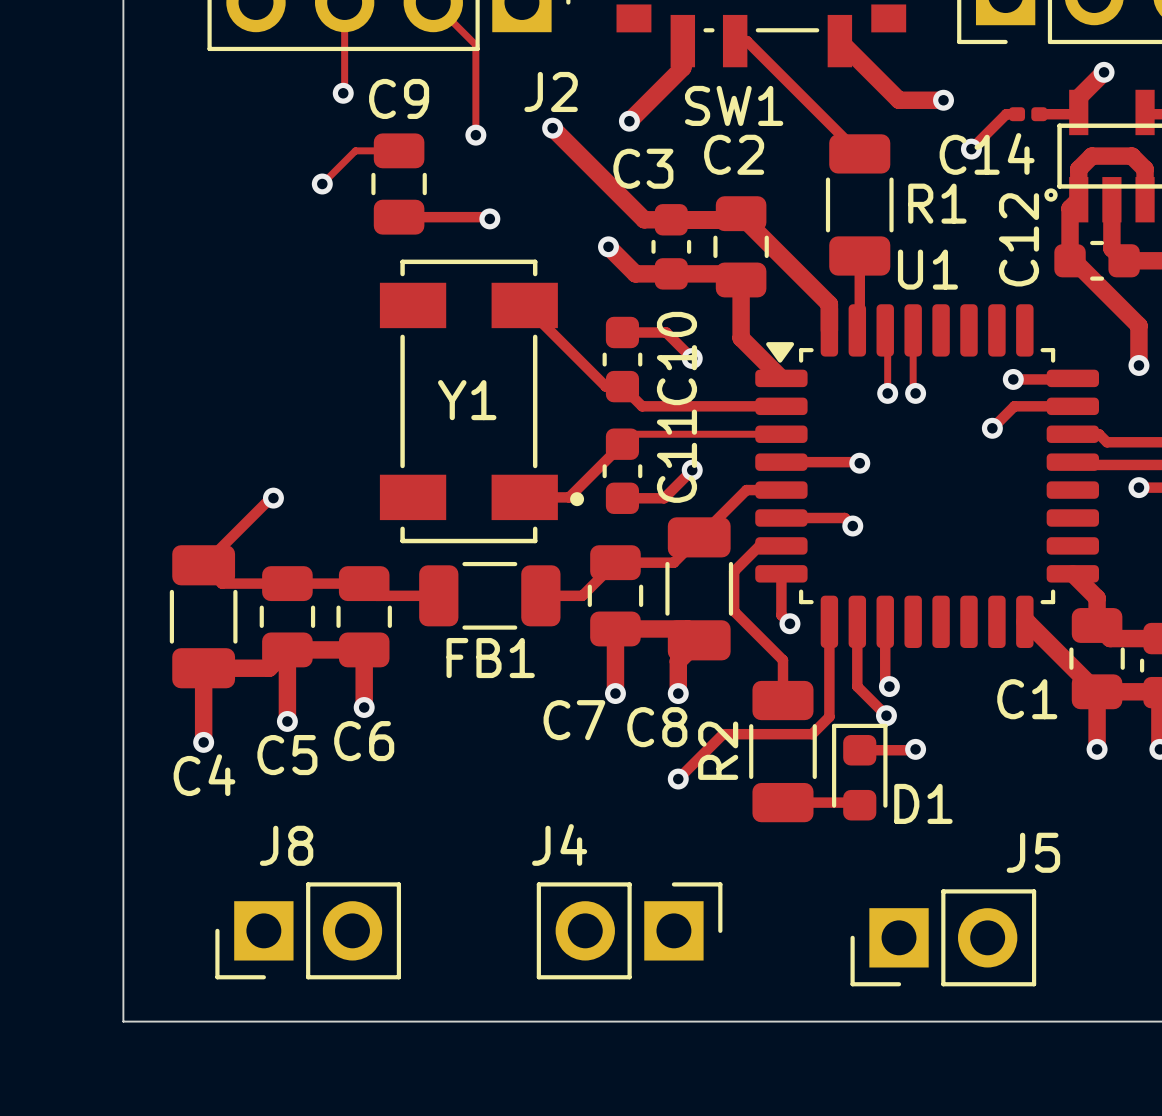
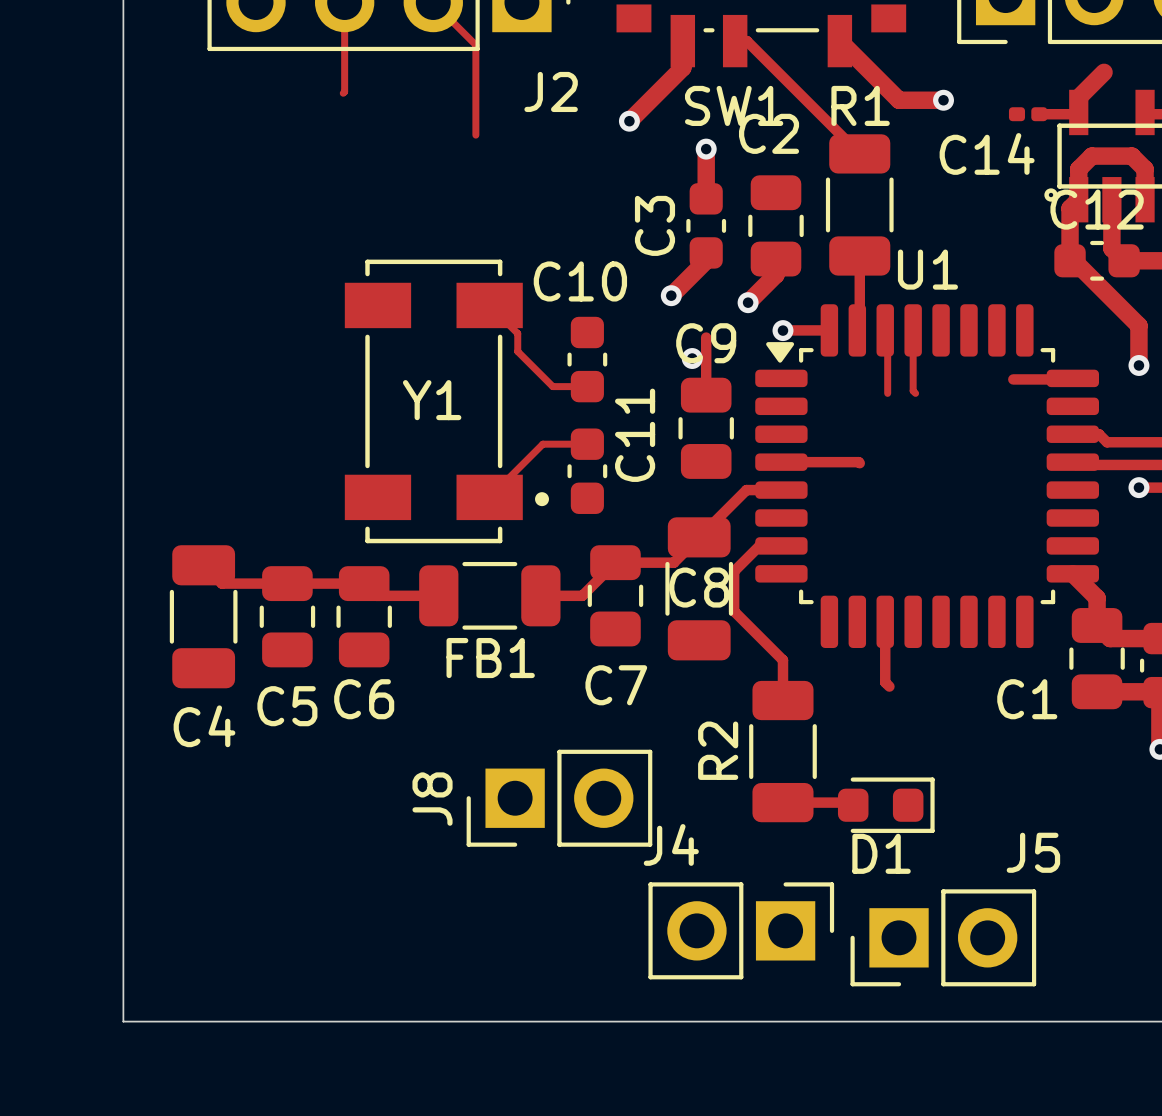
via: (1104, 72) -> none
via: (343, 93) -> none
track: (1016, 114) (1006, 114) (971, 149) -> none
track: (552, 128) (644, 219) (744, 219) (829, 304) (829, 330) -> (783, 330) (829, 330)
via: (552, 128) -> none
via: (475, 135) -> none
track: none -> (706, 149) (706, 198)
via: none -> (706, 149)
via: (971, 149) -> none
track: (399, 150) (355, 150) (322, 184) -> none
C3 name rotation: 0° (643, 168) -> 90° counterclockwise (654, 225)
via: (322, 184) -> none
C9 position: (399, 184) -> (706, 428)
R1 name position: R1 (937, 203) -> R1 (860, 105)
track: (399, 217) (488, 217) (489, 218) -> none
via: (489, 218) -> none
C12 name rotation: 0° (1018, 239) -> 90° clockwise (1097, 209)
track: (608, 246) (635, 273) (734, 273) (741, 279) (741, 338) (781, 378) -> none
via: (608, 246) -> none
C3 position: (671, 246) -> (706, 225)
C2 position: (741, 246) -> (776, 225)
track: none -> (706, 252) (706, 260) (671, 295)
track: none -> (776, 259) (776, 274) (748, 302)
via: none -> (671, 295)
via: none -> (748, 302)
track: none -> (489, 305) (517, 333) (517, 351) (552, 386) (587, 386)
track: (524, 305) (605, 386) (622, 386) (642, 406) (781, 406) -> none
via: none -> (782, 330)
track: (622, 332) (666, 332) (692, 358) -> none
track: none -> (706, 337) (706, 395)
C10 name rotation: 0° (676, 358) -> 90° clockwise (580, 281)
C10 position: (622, 359) -> (587, 359)
via: (1013, 379) -> none
via: (887, 393) -> none
via: (915, 393) -> none
Y1 position: (481, 401) -> (446, 401)
track: (1072, 406) (1014, 406) (992, 428) -> none
via: (992, 428) -> none
track: (780, 433) (632, 434) (569, 497) (524, 497) -> none
track: none -> (587, 444) (542, 444) (489, 497)
C11 name position: C11 (676, 456) -> C11 (635, 435)
via: (859, 463) -> none
track: (692, 470) (664, 498) (622, 498) -> none
via: (692, 470) -> none
C11 position: (622, 471) -> (587, 471)
track: (273, 498) (270, 498) (203, 565) -> none
via: (273, 498) -> none
track: (781, 517) (844, 517) (852, 526) -> none
via: (852, 526) -> none
track: (781, 573) (781, 615) (789, 623) -> none
track: (829, 621) (829, 716) (812, 734) (723, 734) (678, 779) -> none
track: (857, 621) (857, 686) (886, 715) -> none
track: (1024, 621) (1027, 621) (1097, 691) (1097, 749) -> none
via: (789, 623) -> none
track: (287, 649) (364, 649) (364, 707) -> none
track: (287, 649) (287, 721) -> none
track: (287, 649) (269, 668) (203, 668) (203, 742) -> none
via: (889, 686) -> none
track: (615, 693) (615, 628) (687, 628) (699, 640) (678, 661) (678, 693) -> none
via: (615, 693) -> none
via: (678, 693) -> none
via: (364, 707) -> none
via: (886, 715) -> none
C7 name position: C7 (574, 720) -> C7 (616, 685)
via: (287, 721) -> none
C8 name position: C8 (657, 727) -> C8 (699, 587)
C6 name position: C6 (364, 741) -> C6 (364, 699)
via: (203, 742) -> none
track: (915, 749) (859, 750) -> none
via: (915, 749) -> none
via: (1097, 749) -> none
C5 name position: C5 (287, 755) -> C5 (287, 706)
D1 rotation: 0° (859, 772) -> 90° clockwise (886, 805)
C4 name position: C4 (204, 775) -> C4 (204, 726)
via: (678, 779) -> none
J8 name rotation: 0° (286, 845) -> 90° counterclockwise (432, 799)
J8 name position: J8 (286, 845) -> J8 (432, 799)
J8 position: (308, 930) -> (559, 798)
J4 position: (629, 930) -> (741, 930)

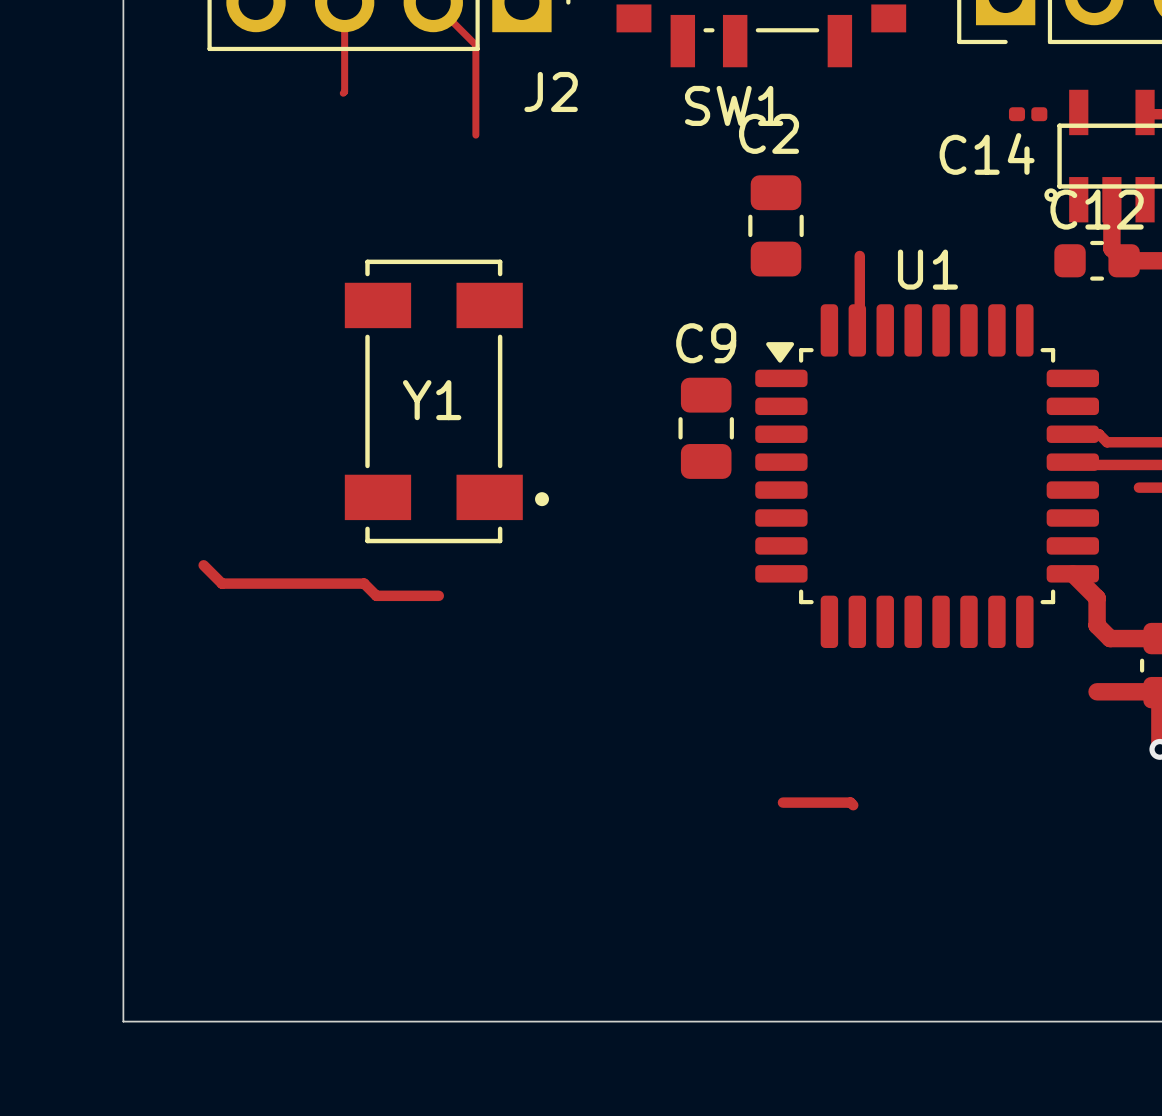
track: (682, 41) (682, 67) (629, 121) -> none
track: (735, 41) (746, 41) (859, 153) (847, 153) -> none
track: (839, 41) (899, 100) (943, 100) -> none
track: (1104, 72) (1078, 97) (1078, 112) (1077, 114) (1039, 114) -> none
via: (943, 100) -> none
via: (629, 121) -> none
track: (706, 149) (706, 198) -> none
via: (706, 149) -> none
track: (1145, 199) (1145, 169) (1131, 156) (1091, 156) (1078, 169) (1078, 199) (1070, 208) (1070, 260) (1074, 260) (1138, 325) (1138, 365) -> none
R1: (859, 204) -> none
C3: (706, 225) -> none
track: (706, 252) (706, 260) (671, 295) -> none
track: (776, 259) (776, 274) (748, 302) -> none
via: (671, 295) -> none
via: (748, 302) -> none
track: (489, 305) (517, 333) (517, 351) (552, 386) (587, 386) -> none
via: (782, 330) -> none
track: (783, 330) (829, 330) -> none
track: (885, 330) (887, 332) (887, 393) -> none
track: (913, 330) (913, 390) (915, 393) -> none
track: (706, 337) (706, 395) -> none
via: (692, 358) -> none
C10: (587, 359) -> none
via: (1138, 365) -> none
track: (1072, 378) (1013, 379) -> none
track: (587, 444) (542, 444) (489, 497) -> none
track: (780, 461) (859, 463) -> none
C11: (587, 471) -> none
via: (1138, 487) -> none
track: (781, 490) (746, 490) (673, 562) (615, 562) (582, 595) (540, 595) -> none
track: (781, 545) (759, 545) (734, 571) (734, 611) (782, 660) (782, 700) -> none
C8: (699, 588) -> none
FB1: (489, 595) -> none
C7: (615, 595) -> none
C4: (203, 616) -> none
C5: (287, 616) -> none
C6: (364, 616) -> none
track: (885, 621) (885, 682) (889, 686) -> none
C1: (1097, 658) -> none
R2: (782, 751) -> none
J8: (559, 798) -> none
D1: (886, 805) -> none
J4: (741, 930) -> none
J5: (943, 937) -> none

